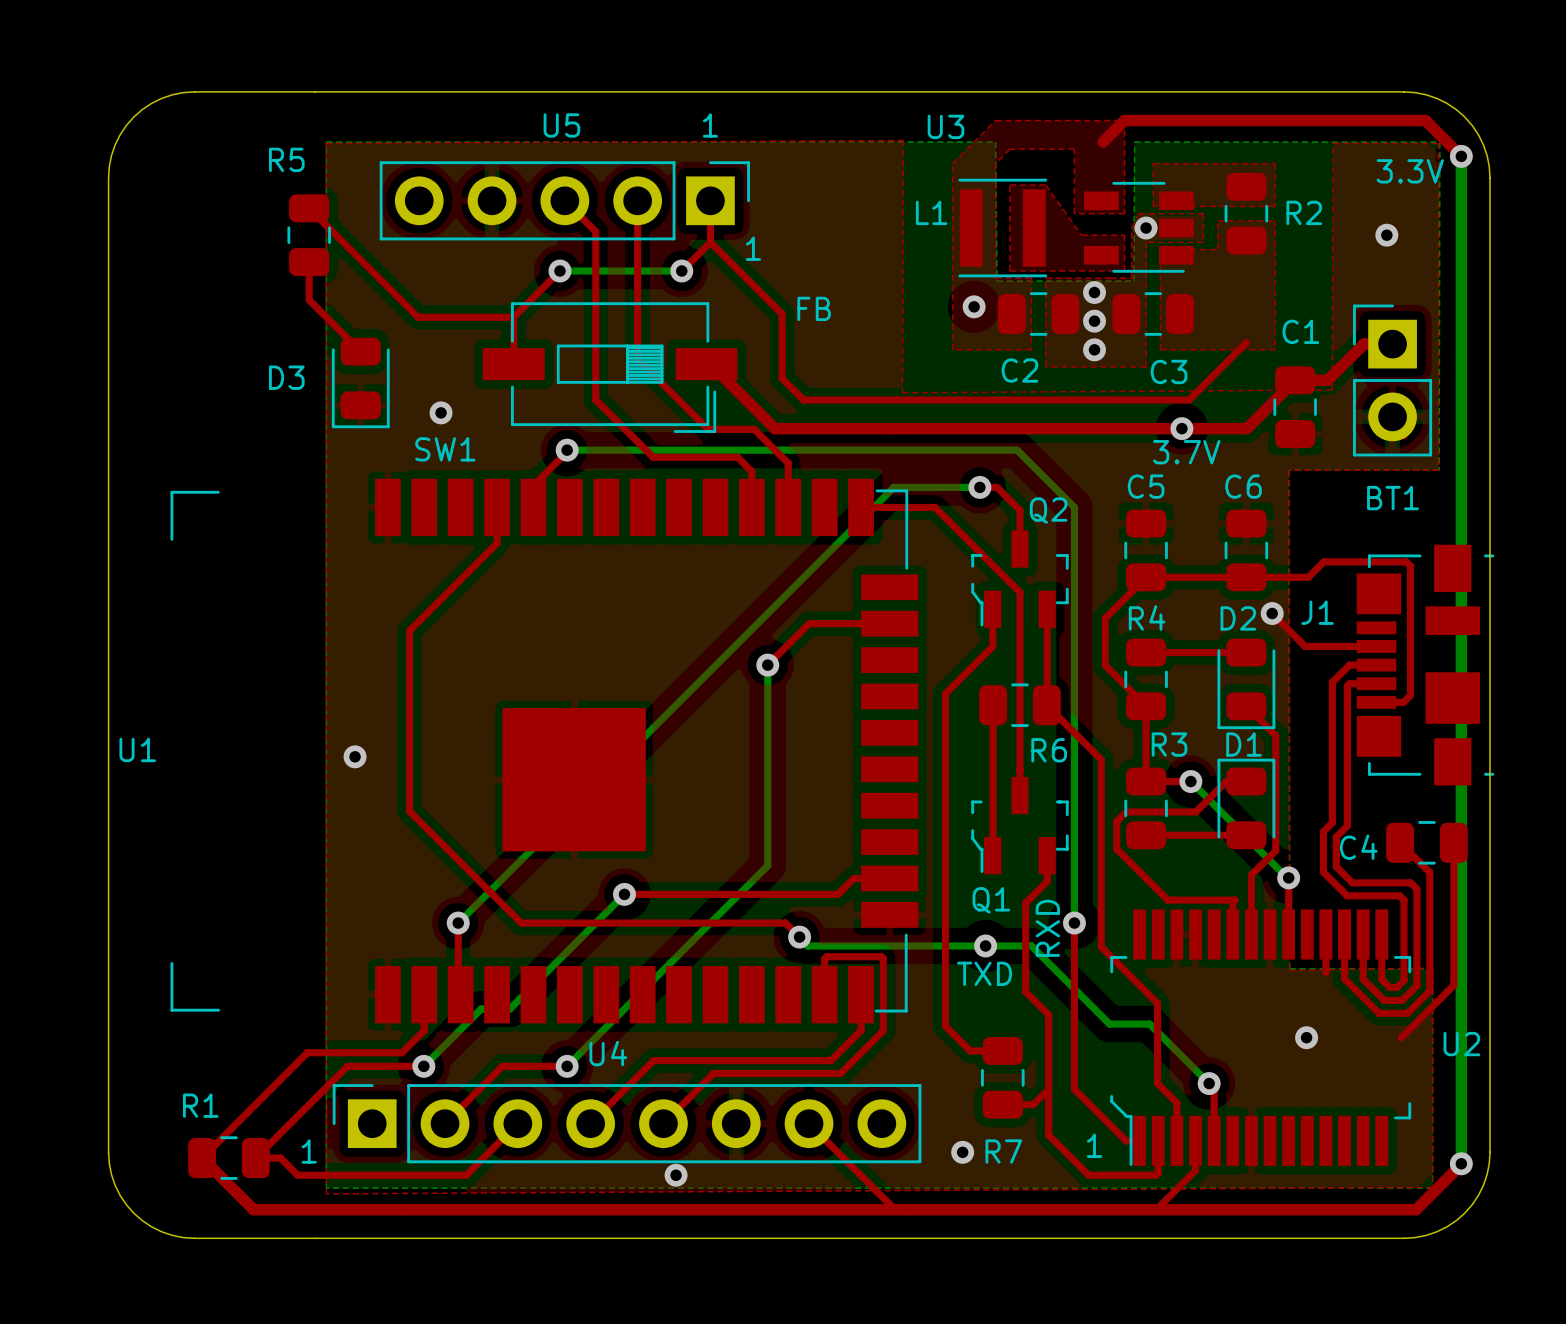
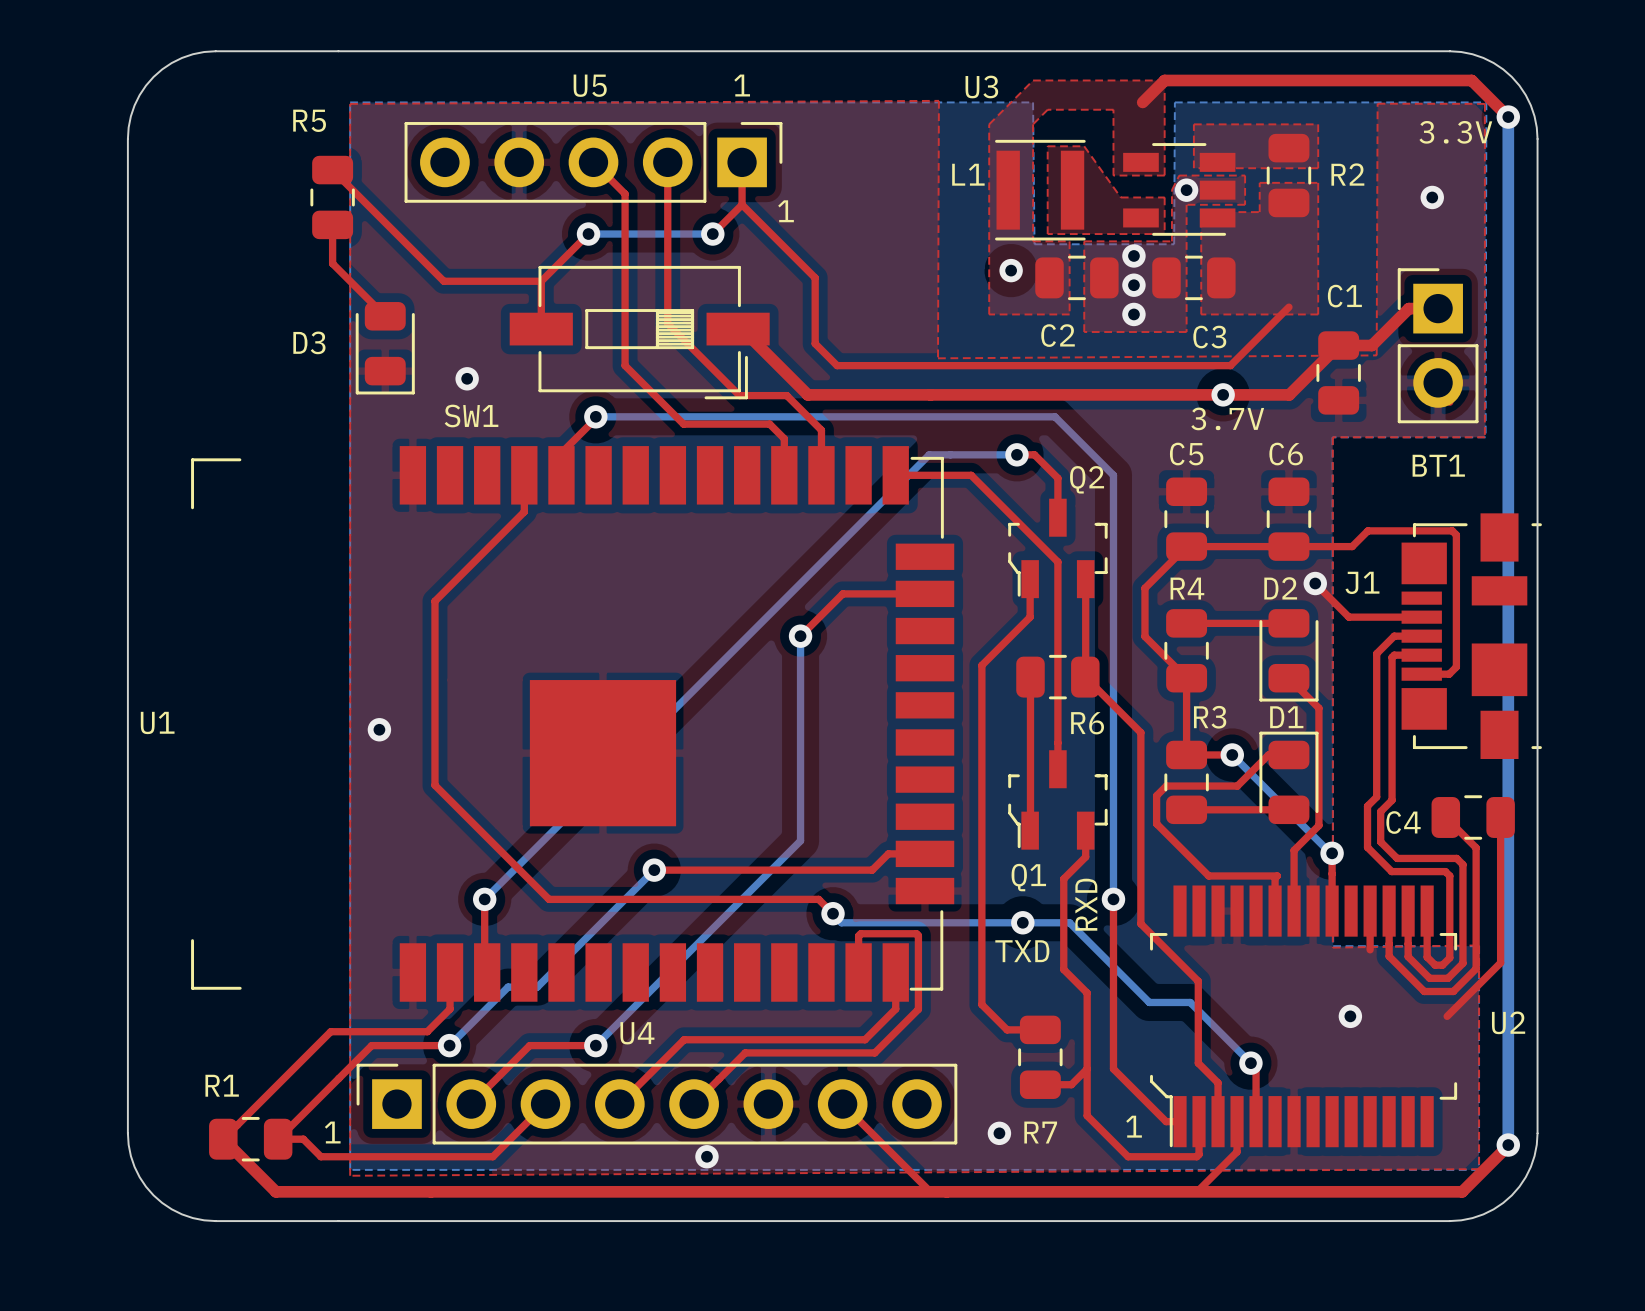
text: FB (814, 308) -> none

